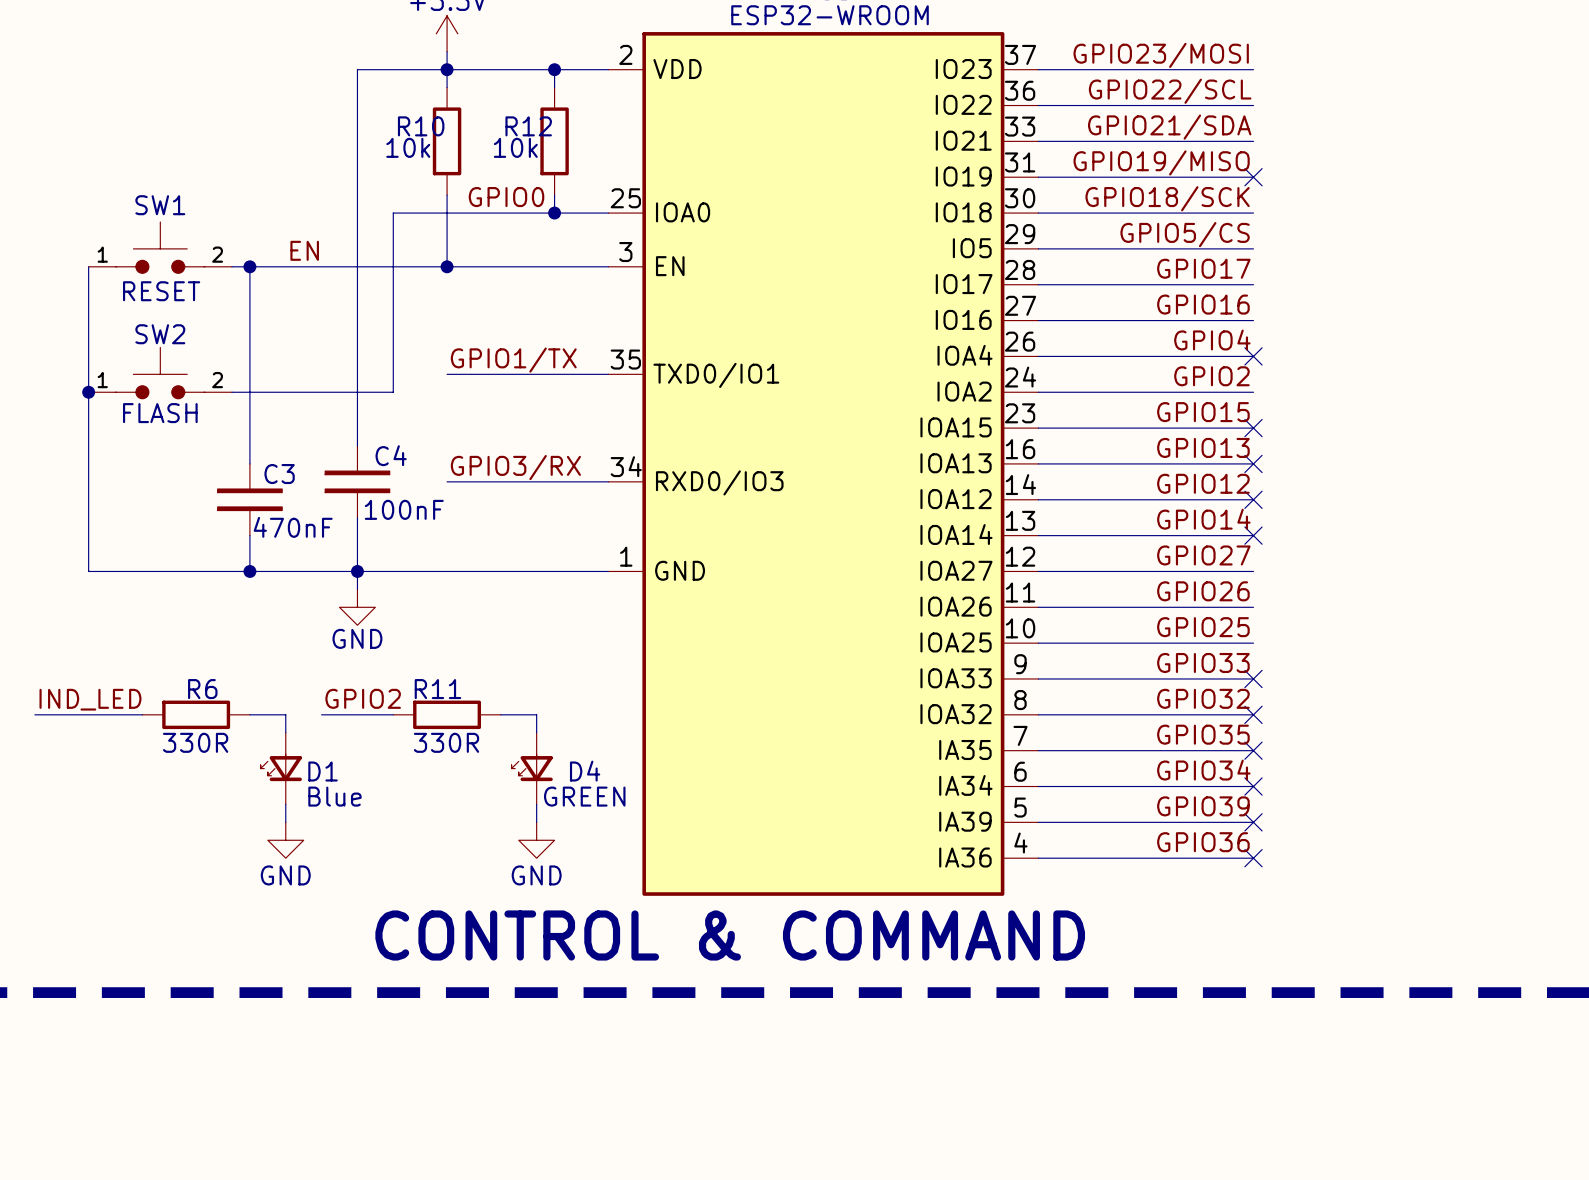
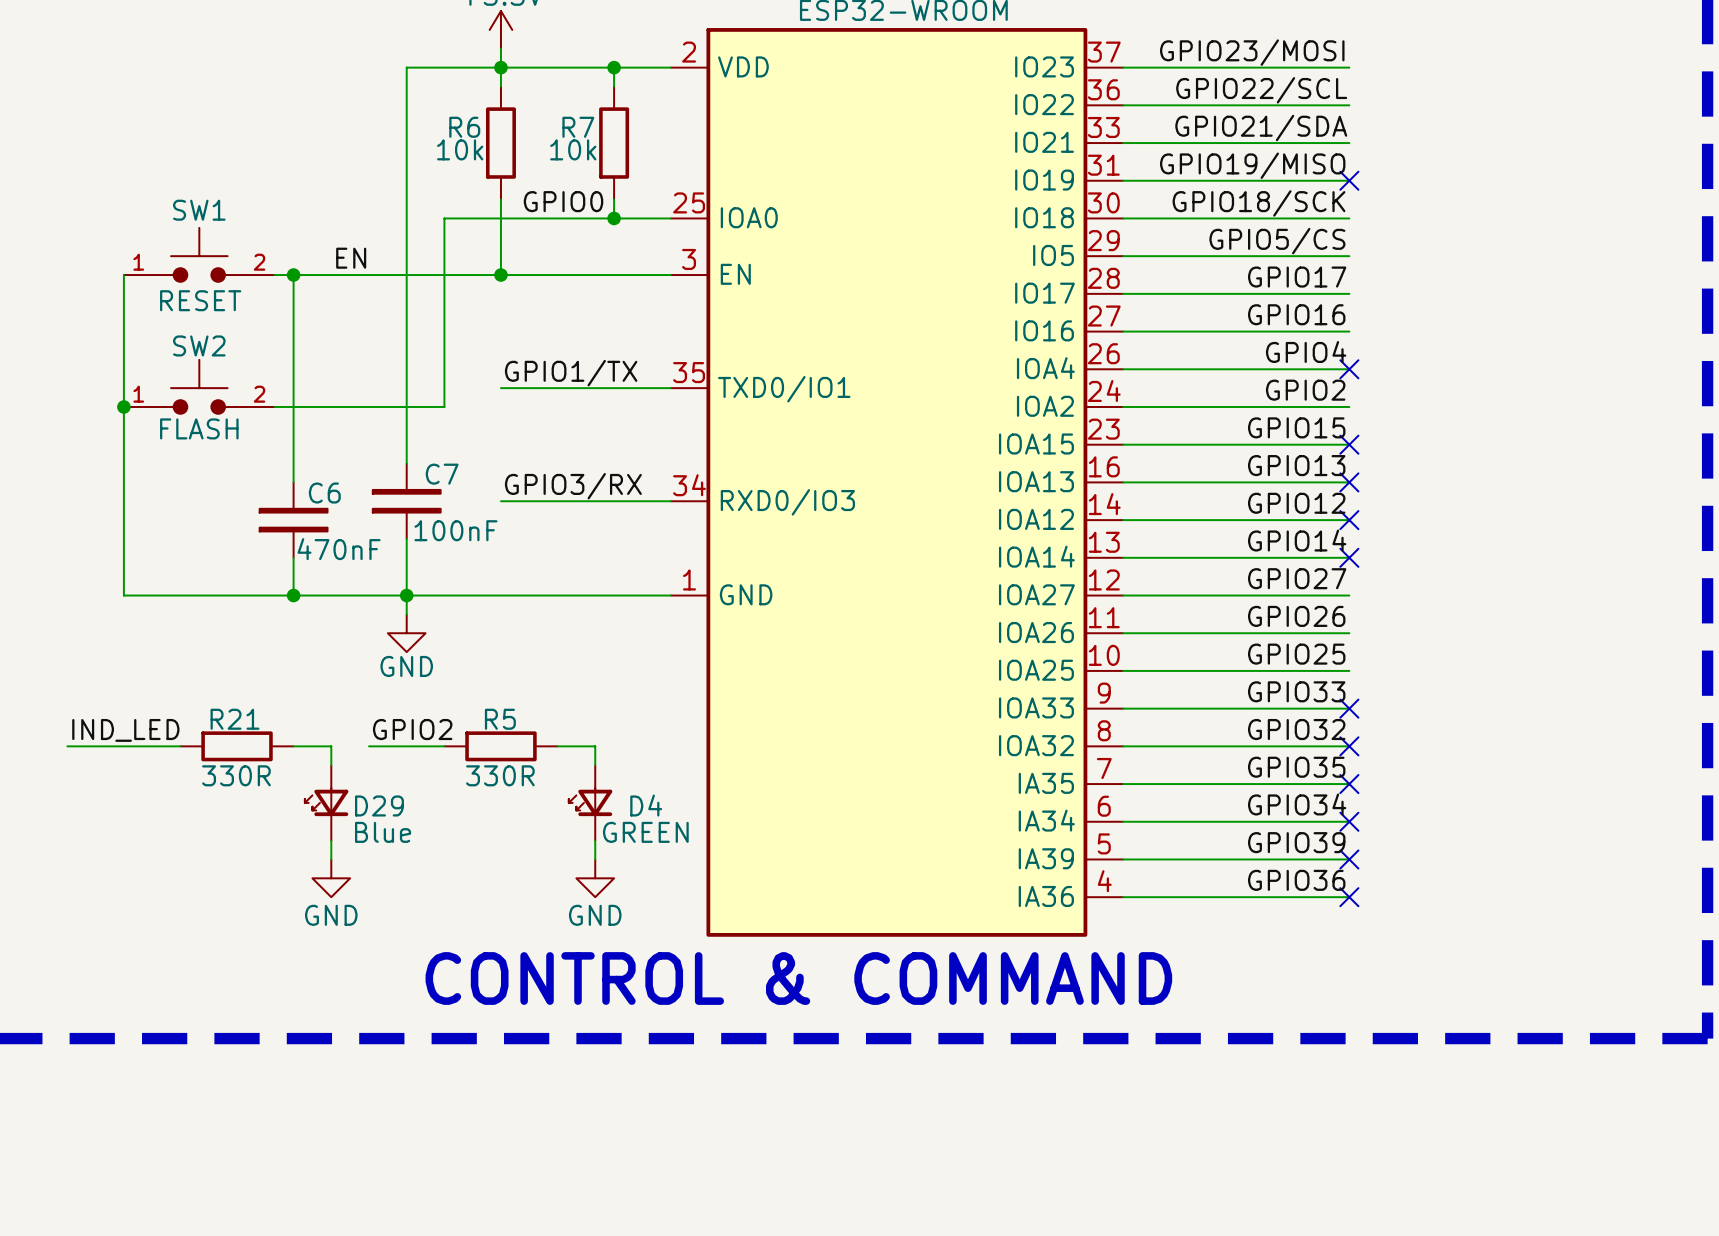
R10 name: R10 (421, 126) -> R6 (464, 127)
R12 name: R12 (528, 126) -> R7 (578, 127)
C4 name: C4 (391, 455) -> C7 (442, 474)
C3 name: C3 (279, 474) -> C6 (324, 493)
R6 name: R6 (202, 689) -> R21 (235, 719)
R11 name: R11 (437, 689) -> R5 (500, 719)
D1 name: D1 (323, 771) -> D29 (379, 805)

